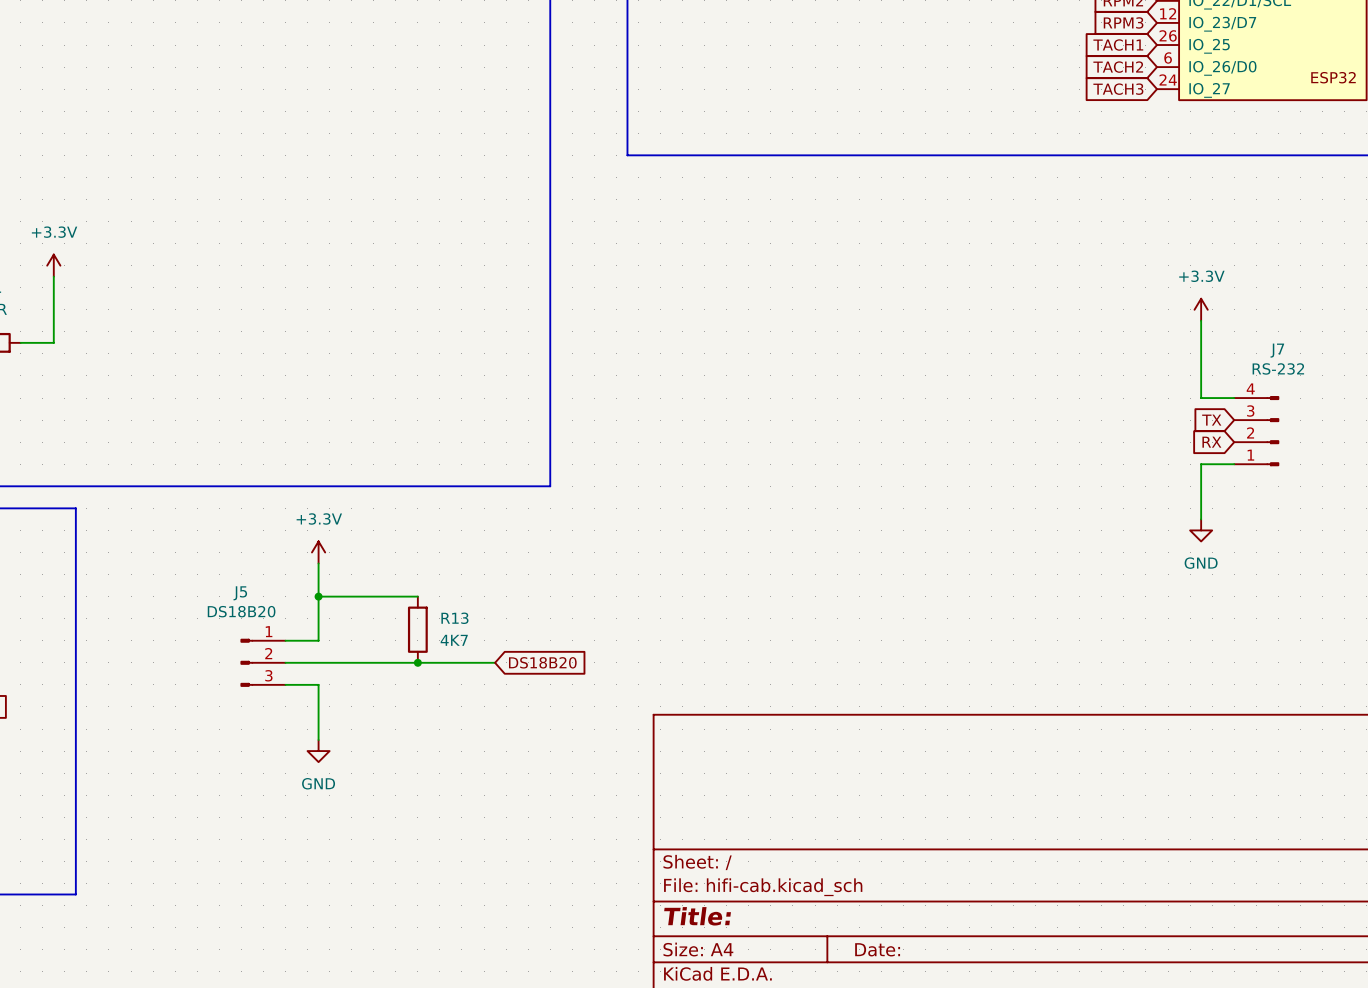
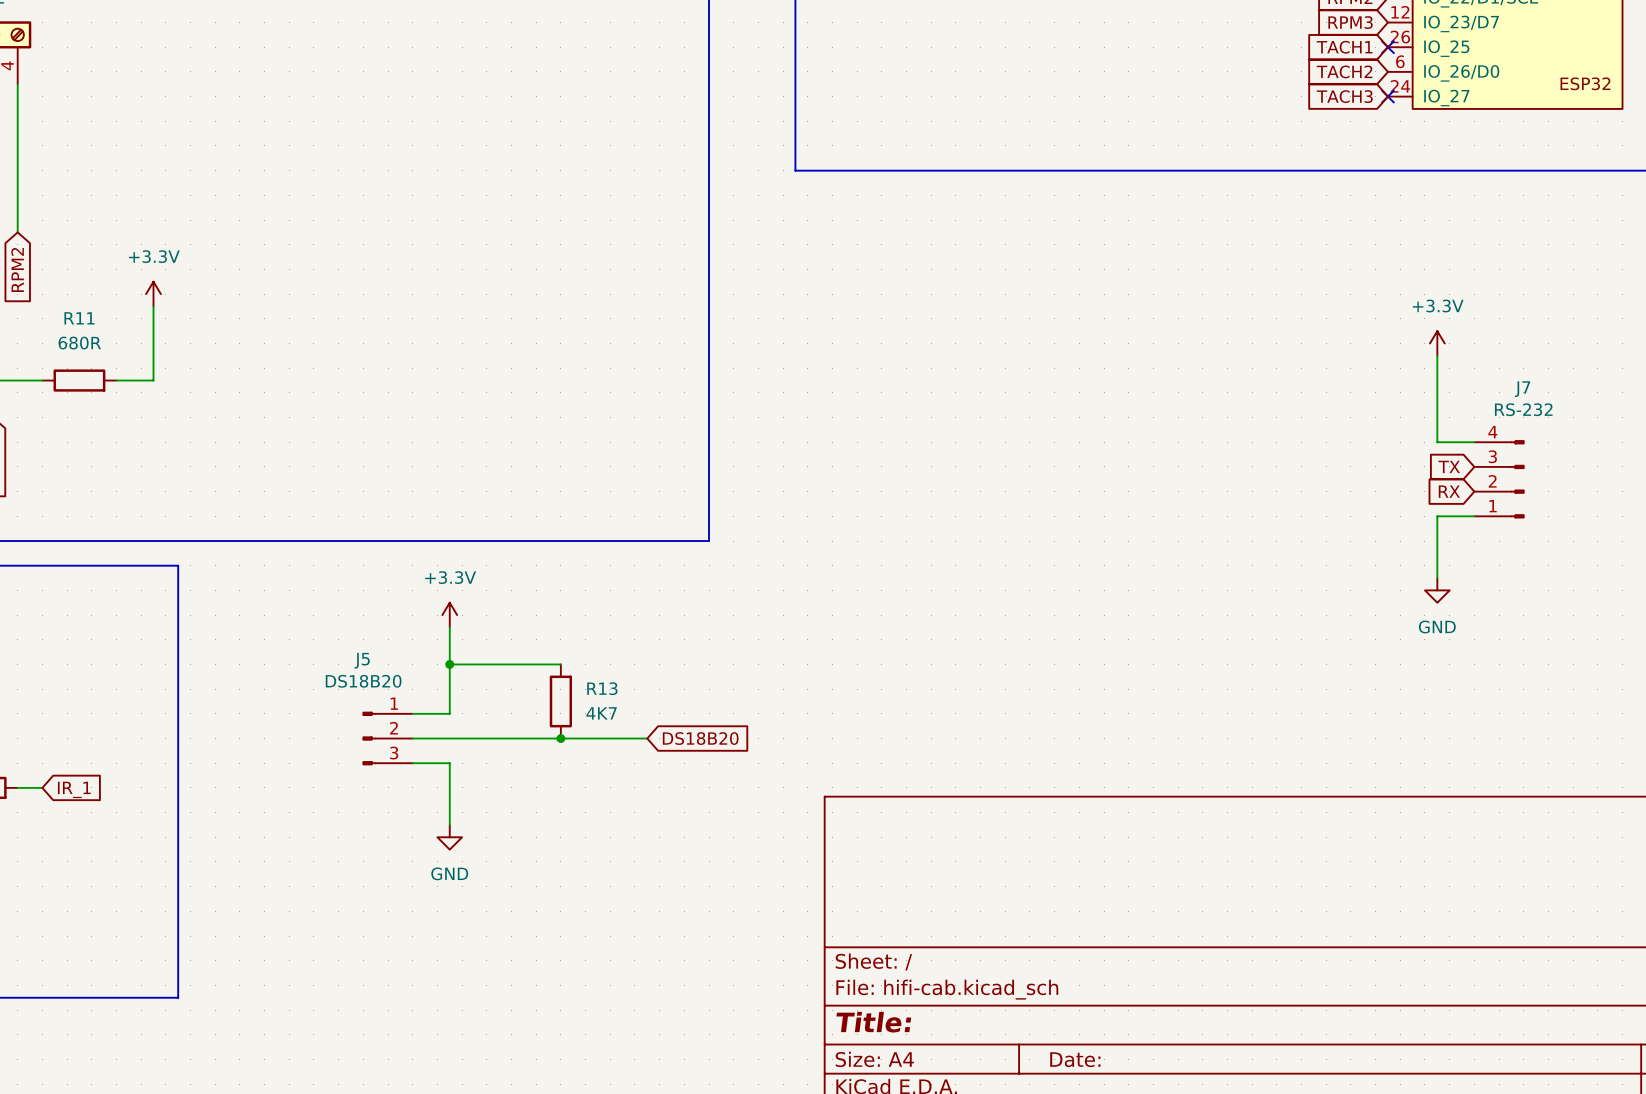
no-connect mark: none -> (1387, 47)
no-connect mark: none -> (1387, 96)

